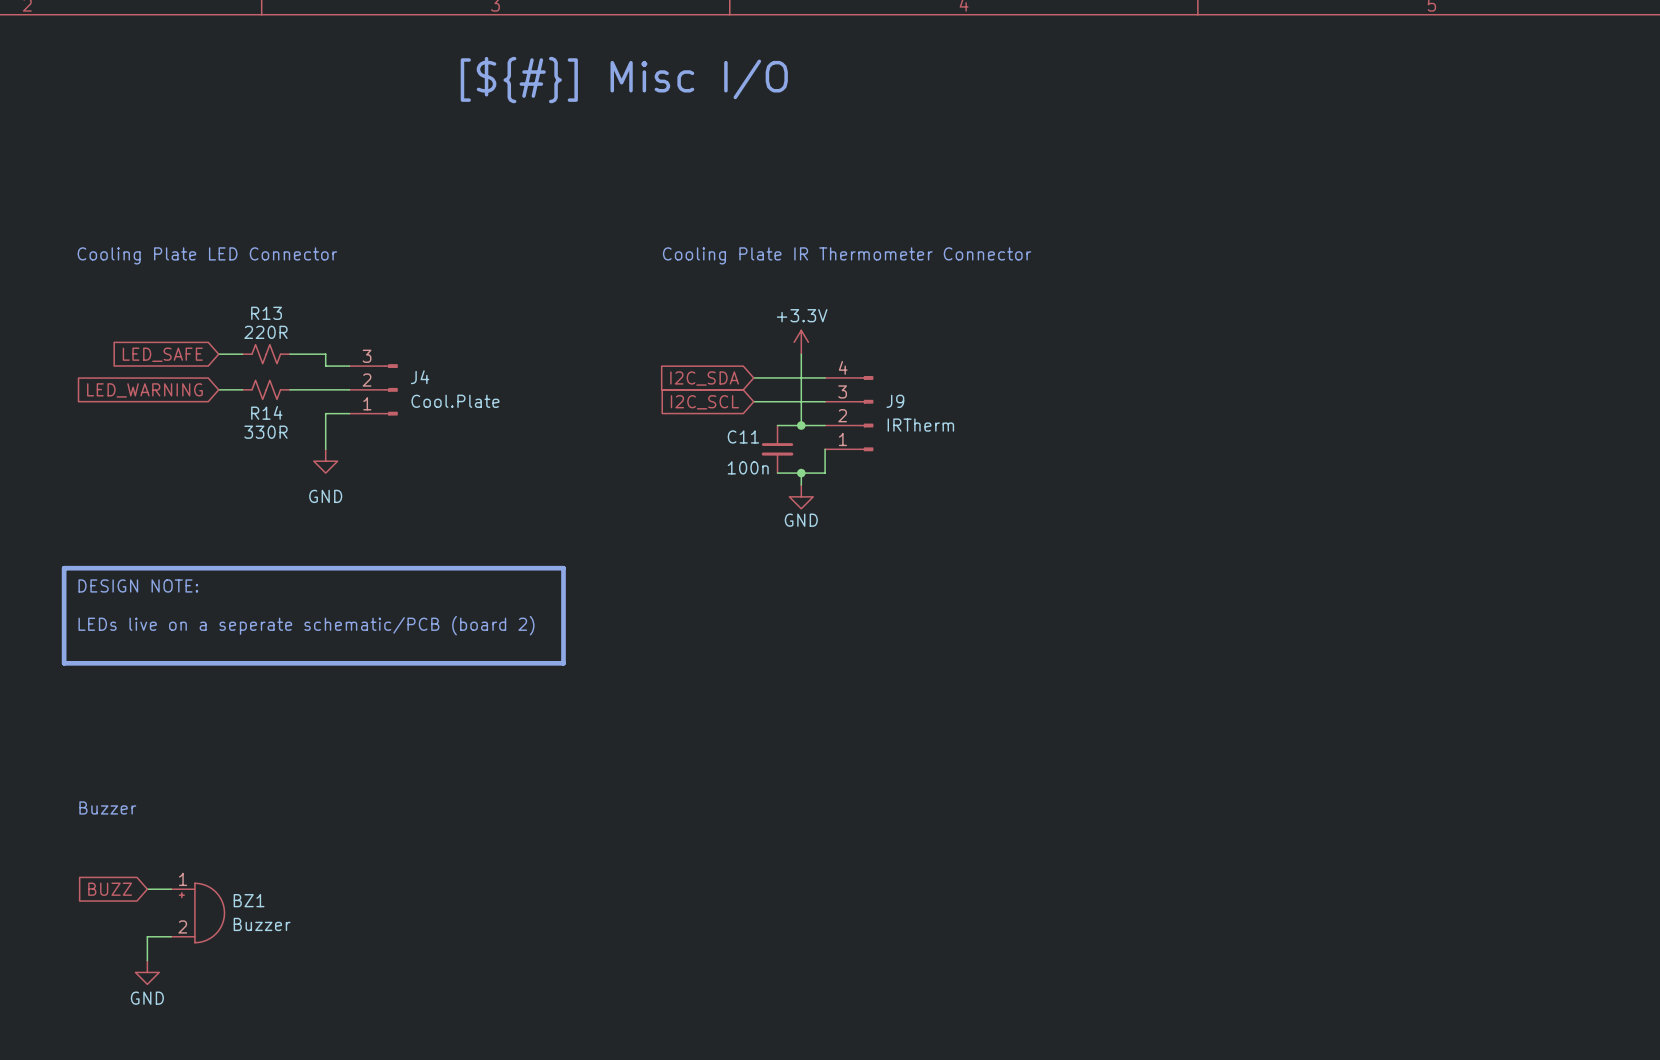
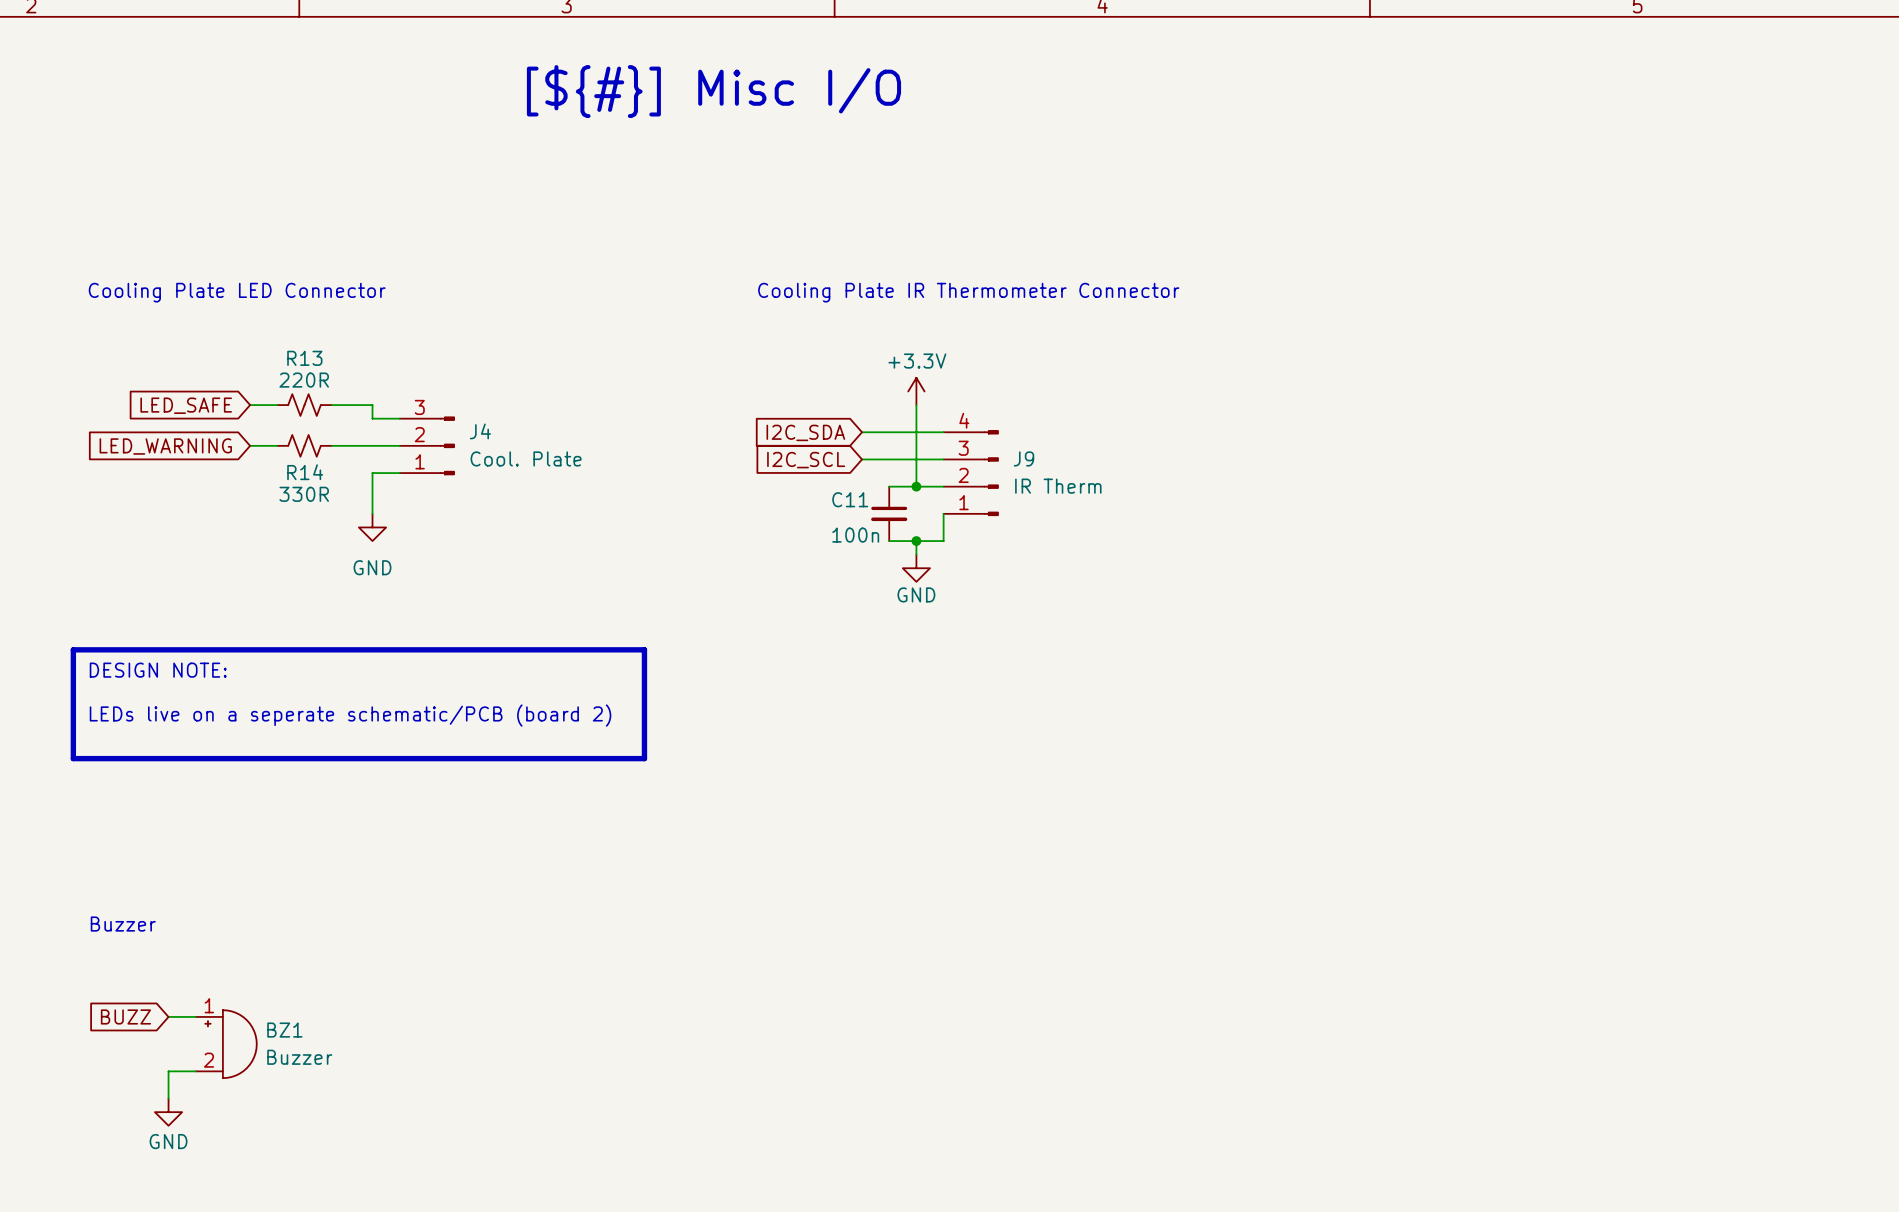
J4 value: Cool.Plate (455, 401) -> Cool. Plate (526, 458)
J9 value: IRTherm (920, 425) -> IR Therm (1058, 486)

